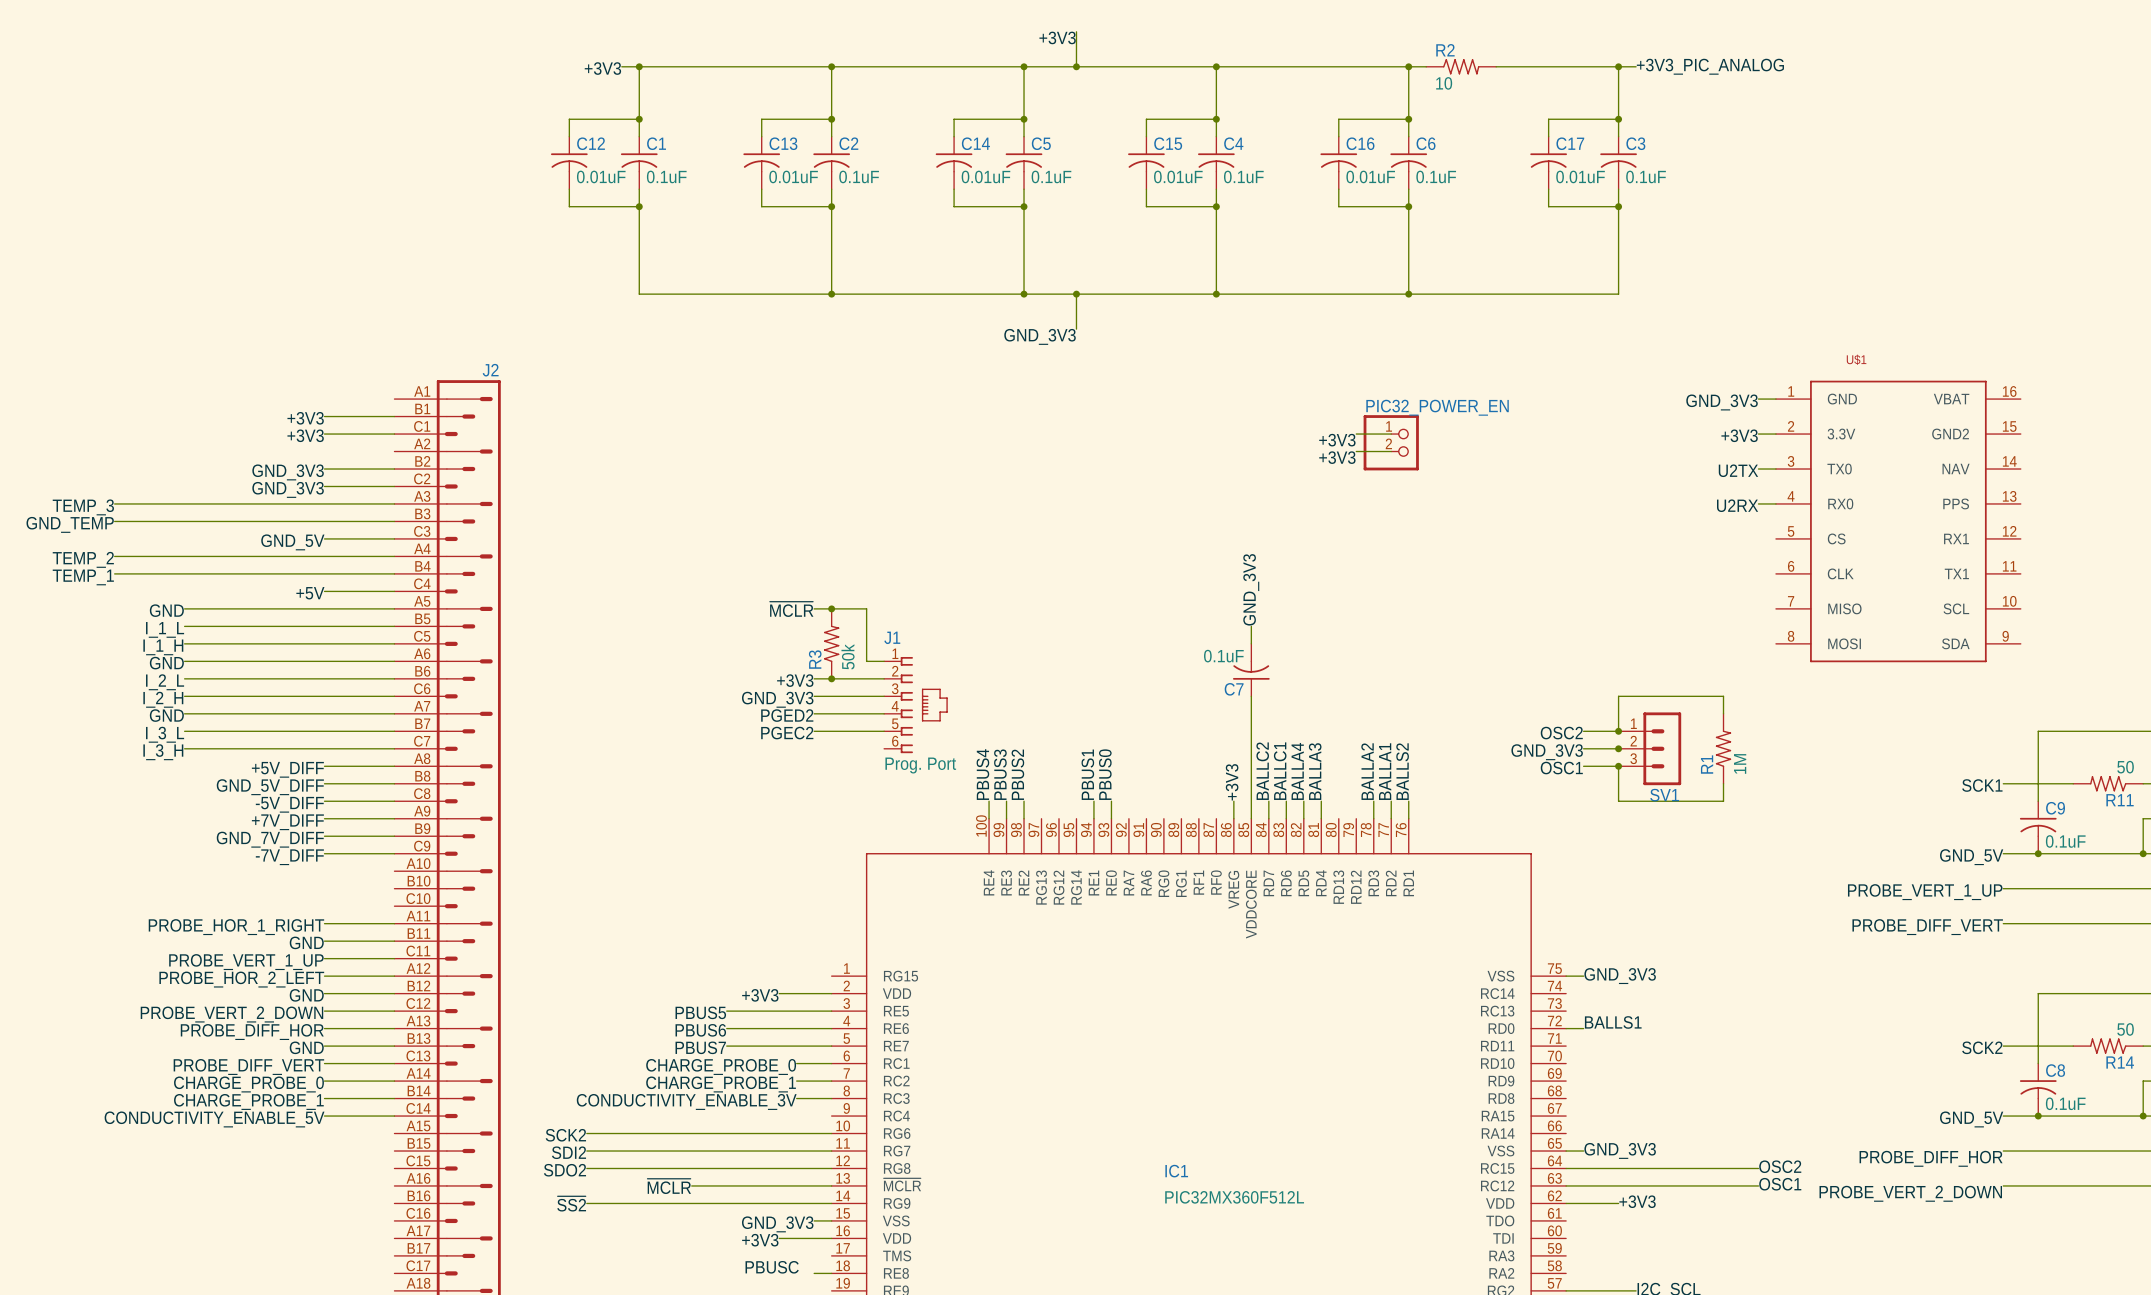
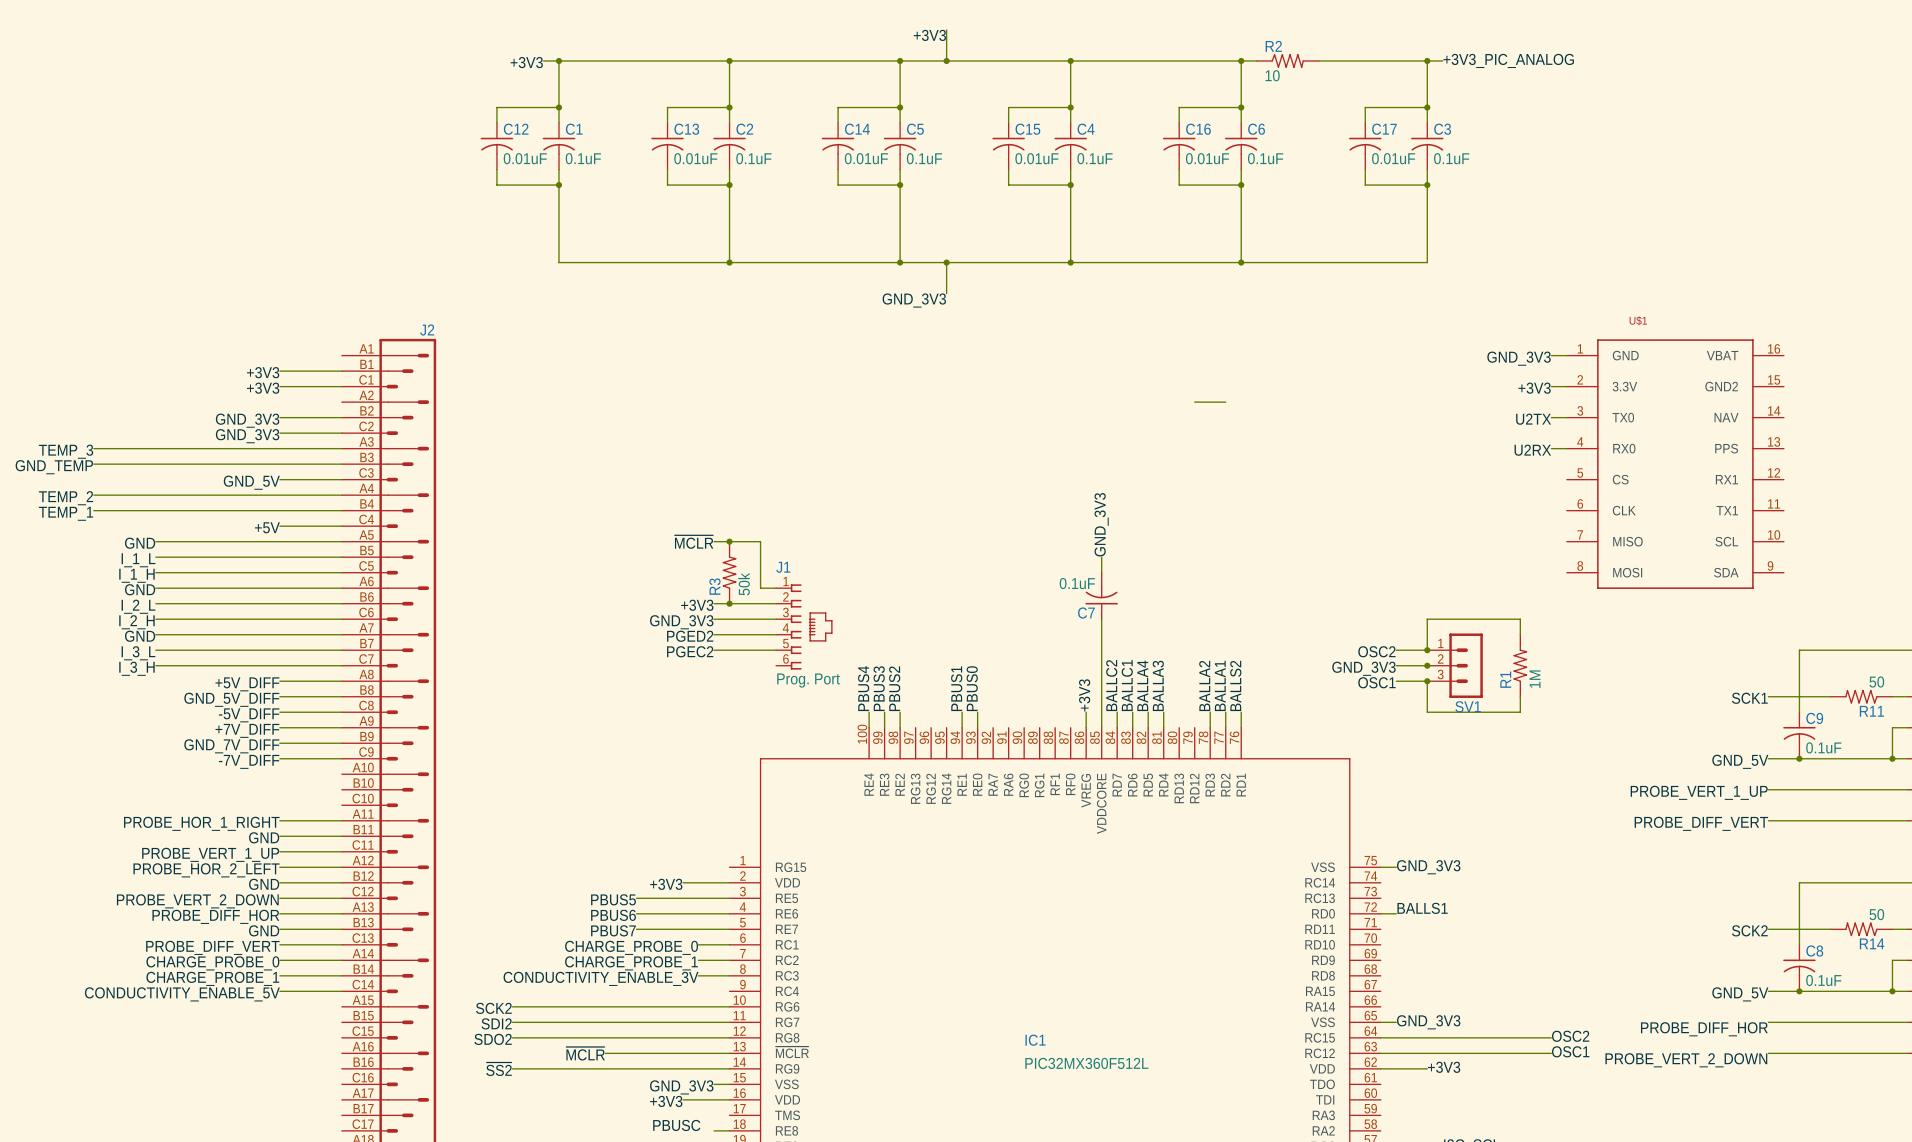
wire: (1356, 434) (1391, 434) -> none
label: +3V3 (1337, 440) -> none
PIC32_POWER_EN: (1391, 442) -> none
label: +3V3 (1337, 457) -> none

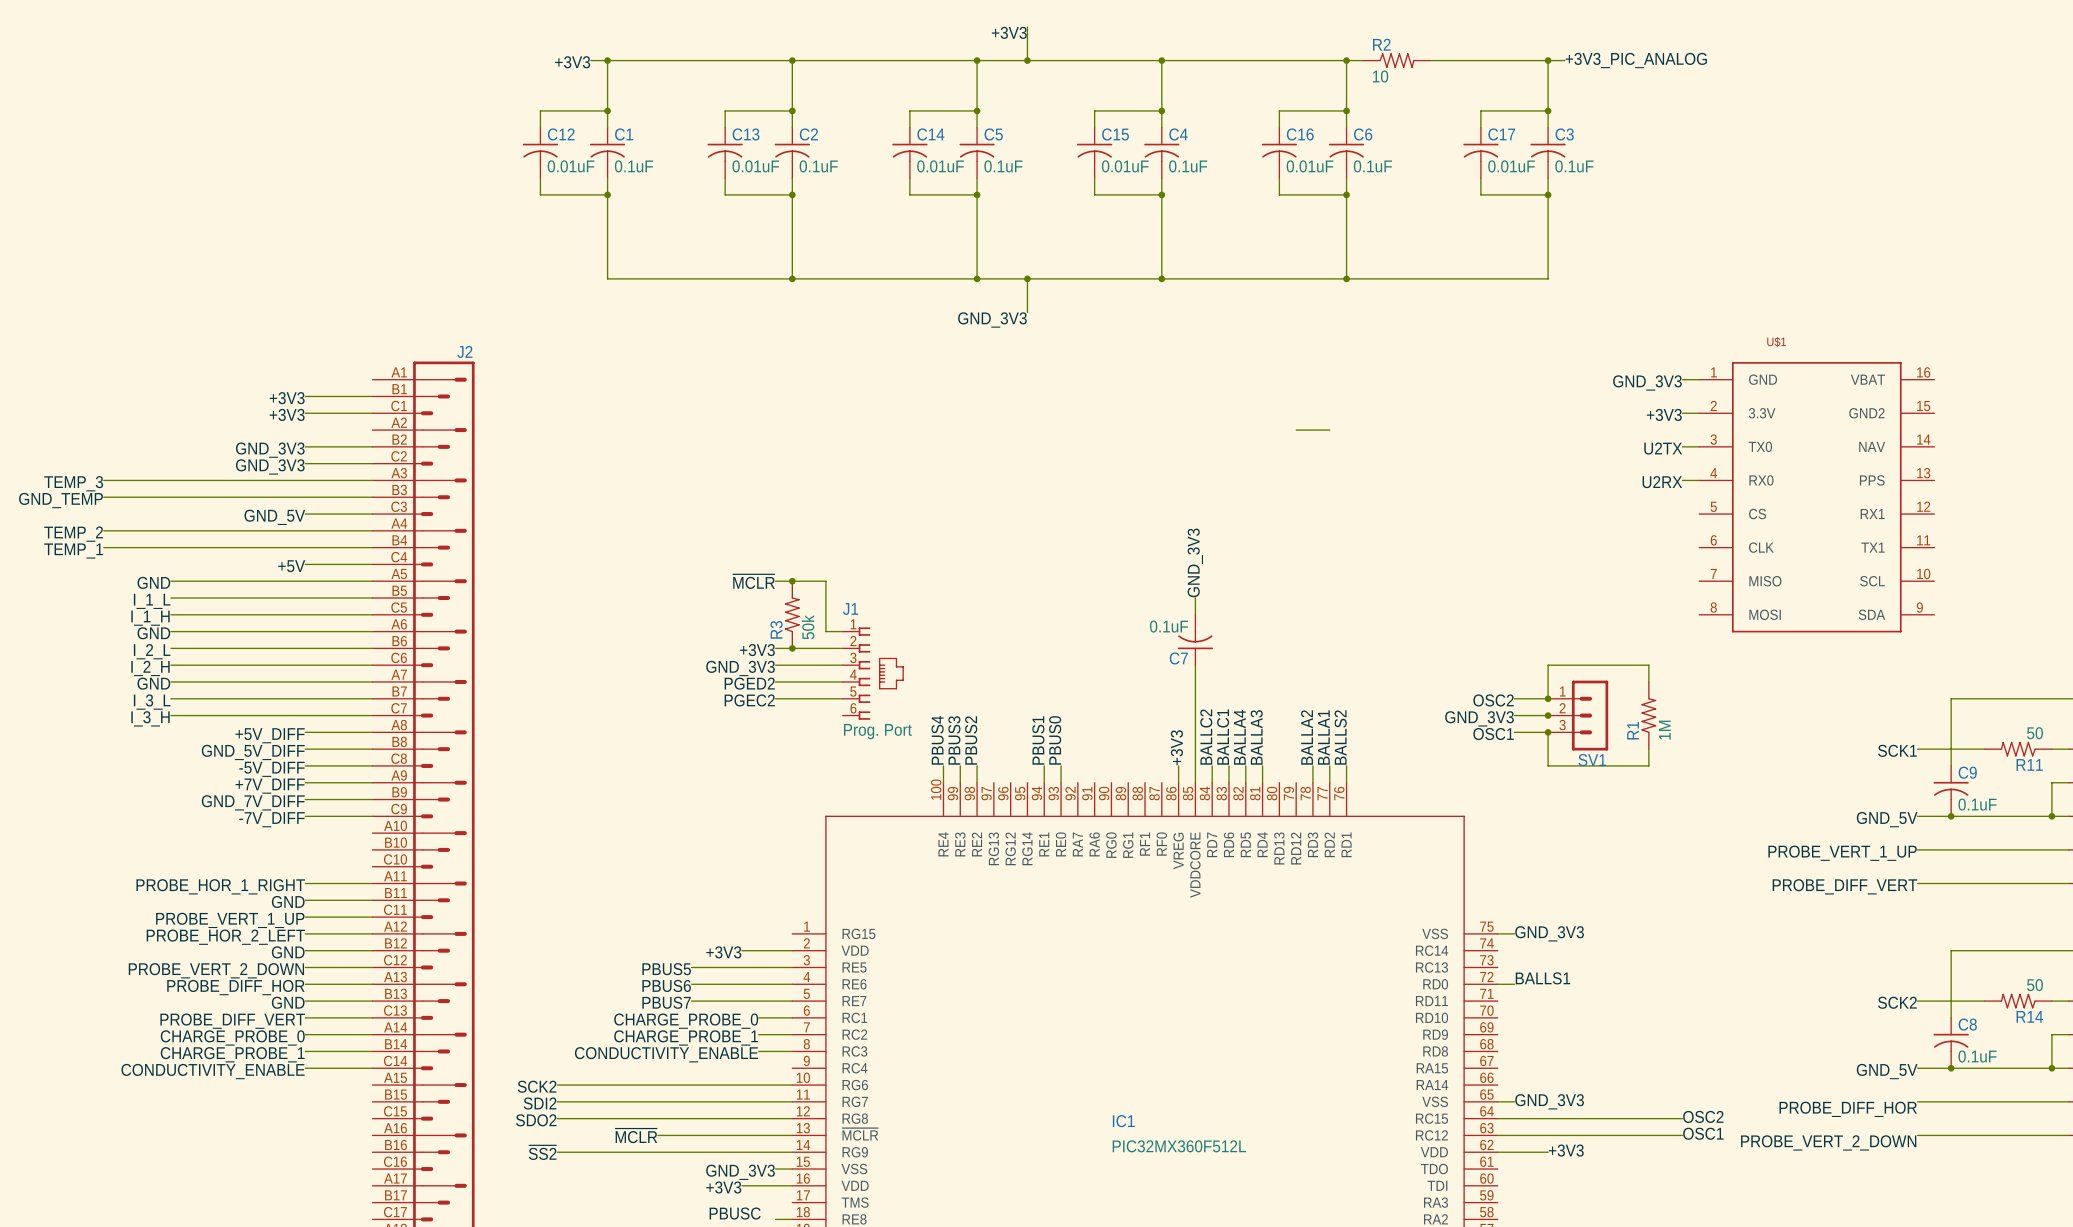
label: CONDUCTIVITY_ENABLE_3V (601, 978) -> CONDUCTIVITY_ENABLE (666, 1054)
label: CONDUCTIVITY_ENABLE_5V (182, 994) -> CONDUCTIVITY_ENABLE (213, 1071)

